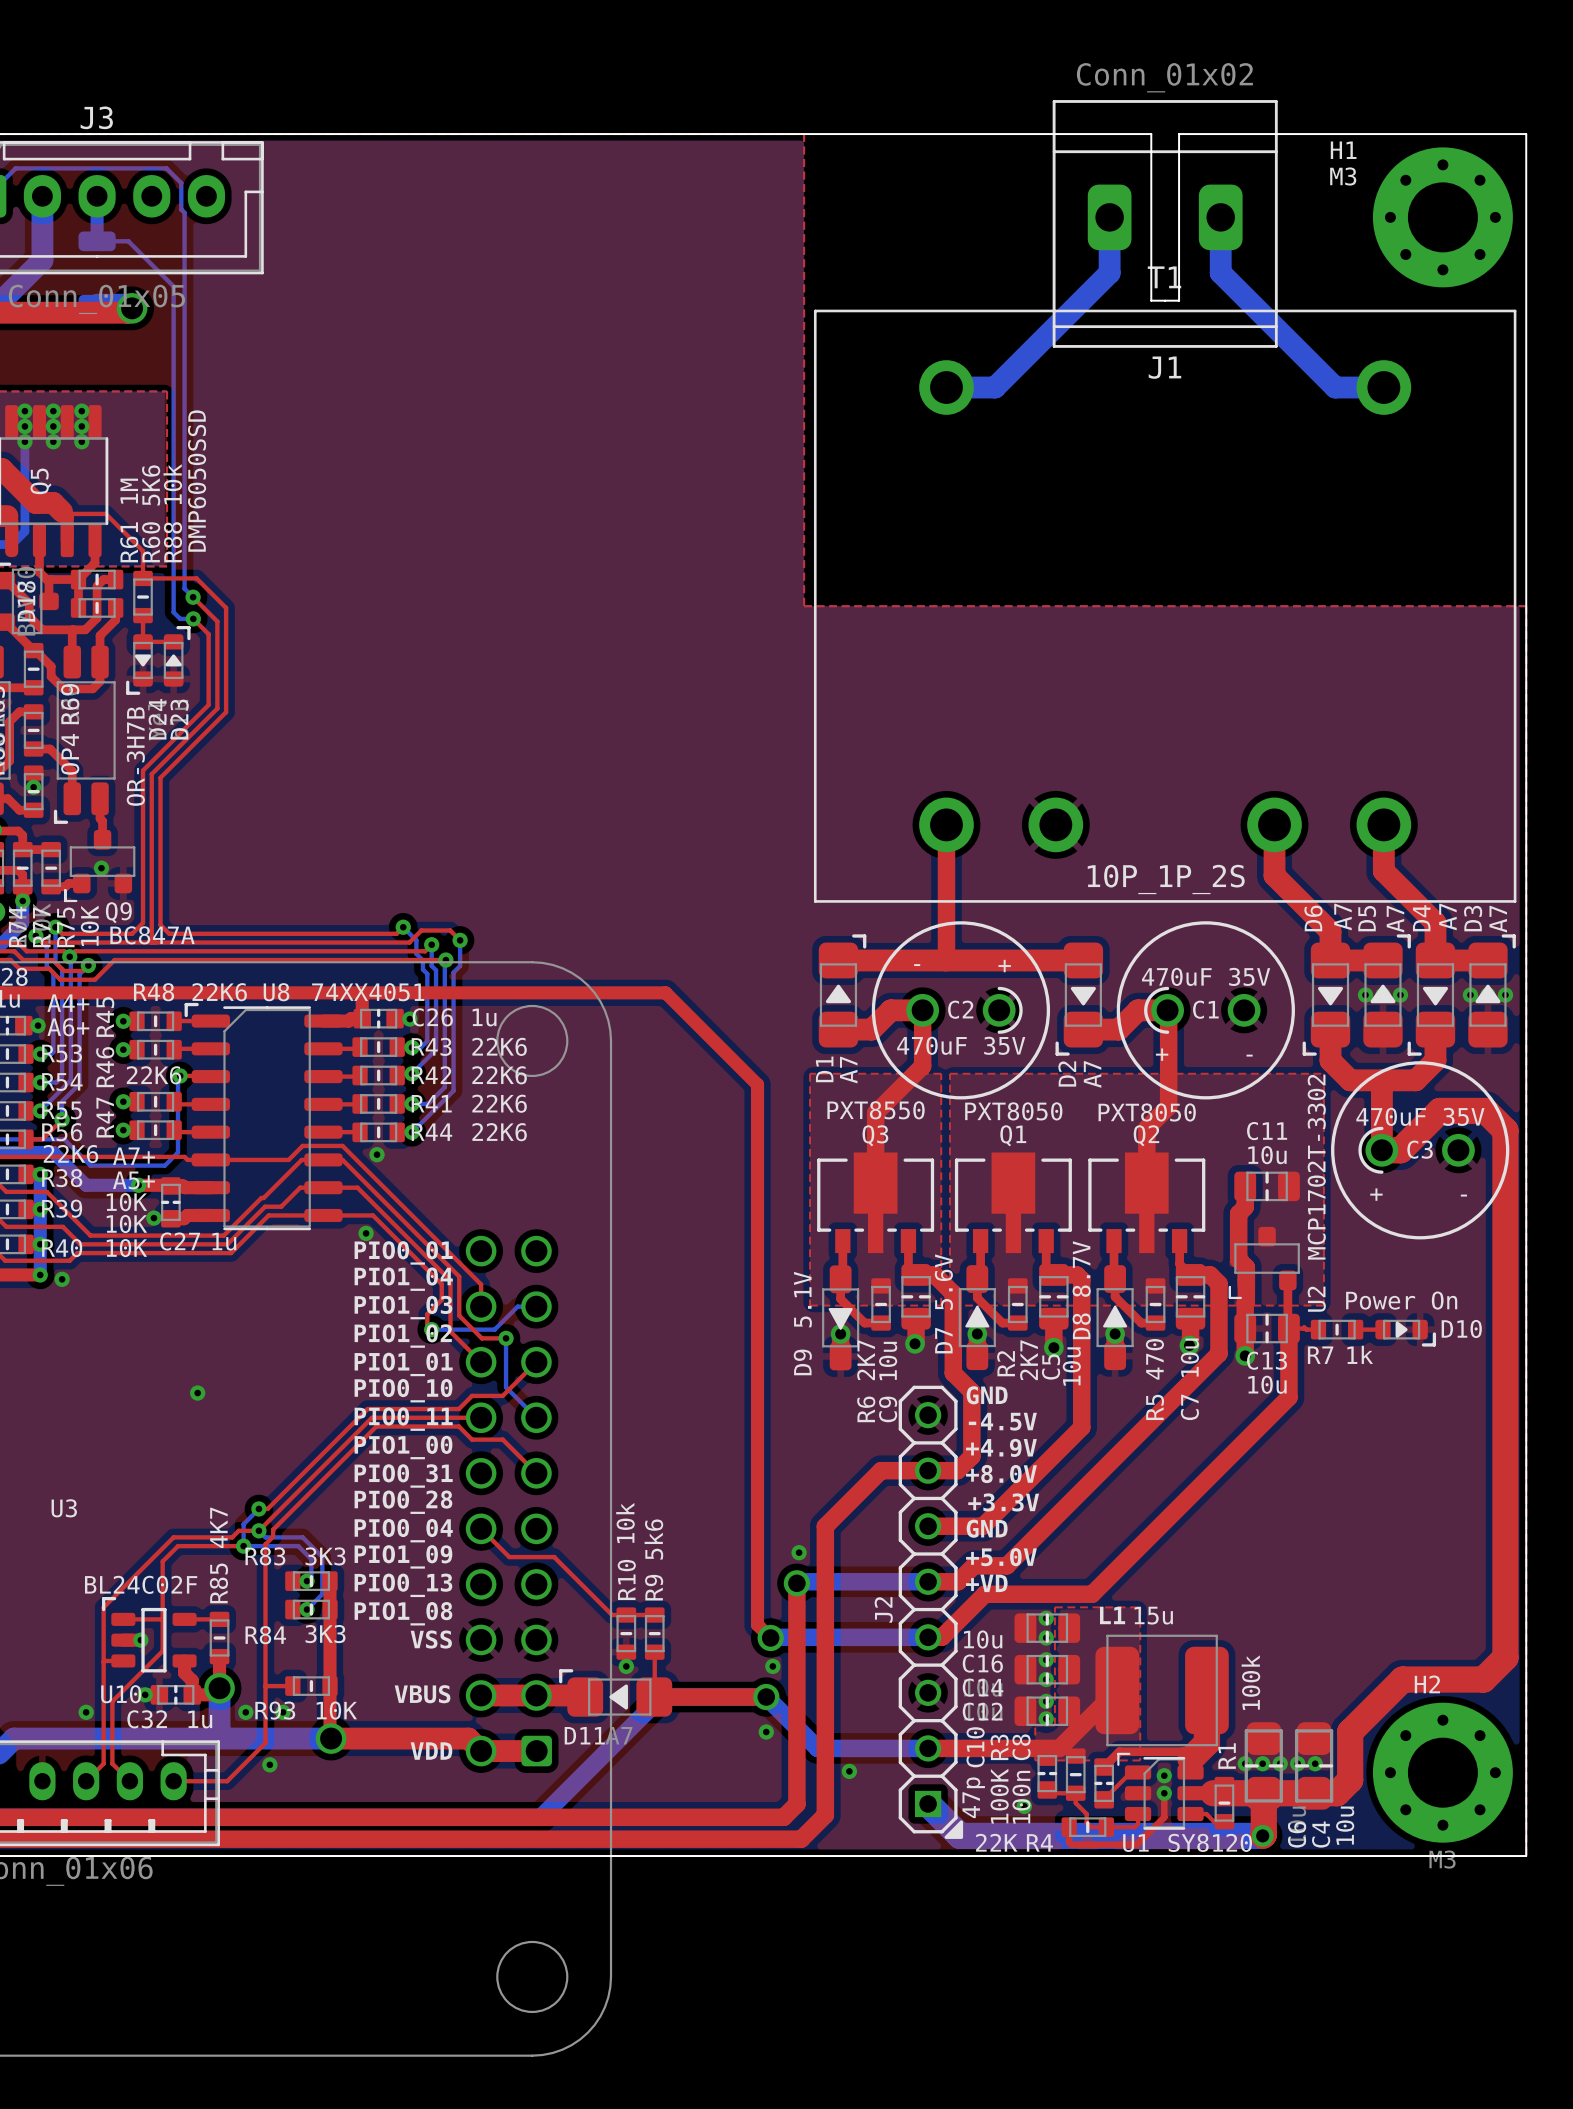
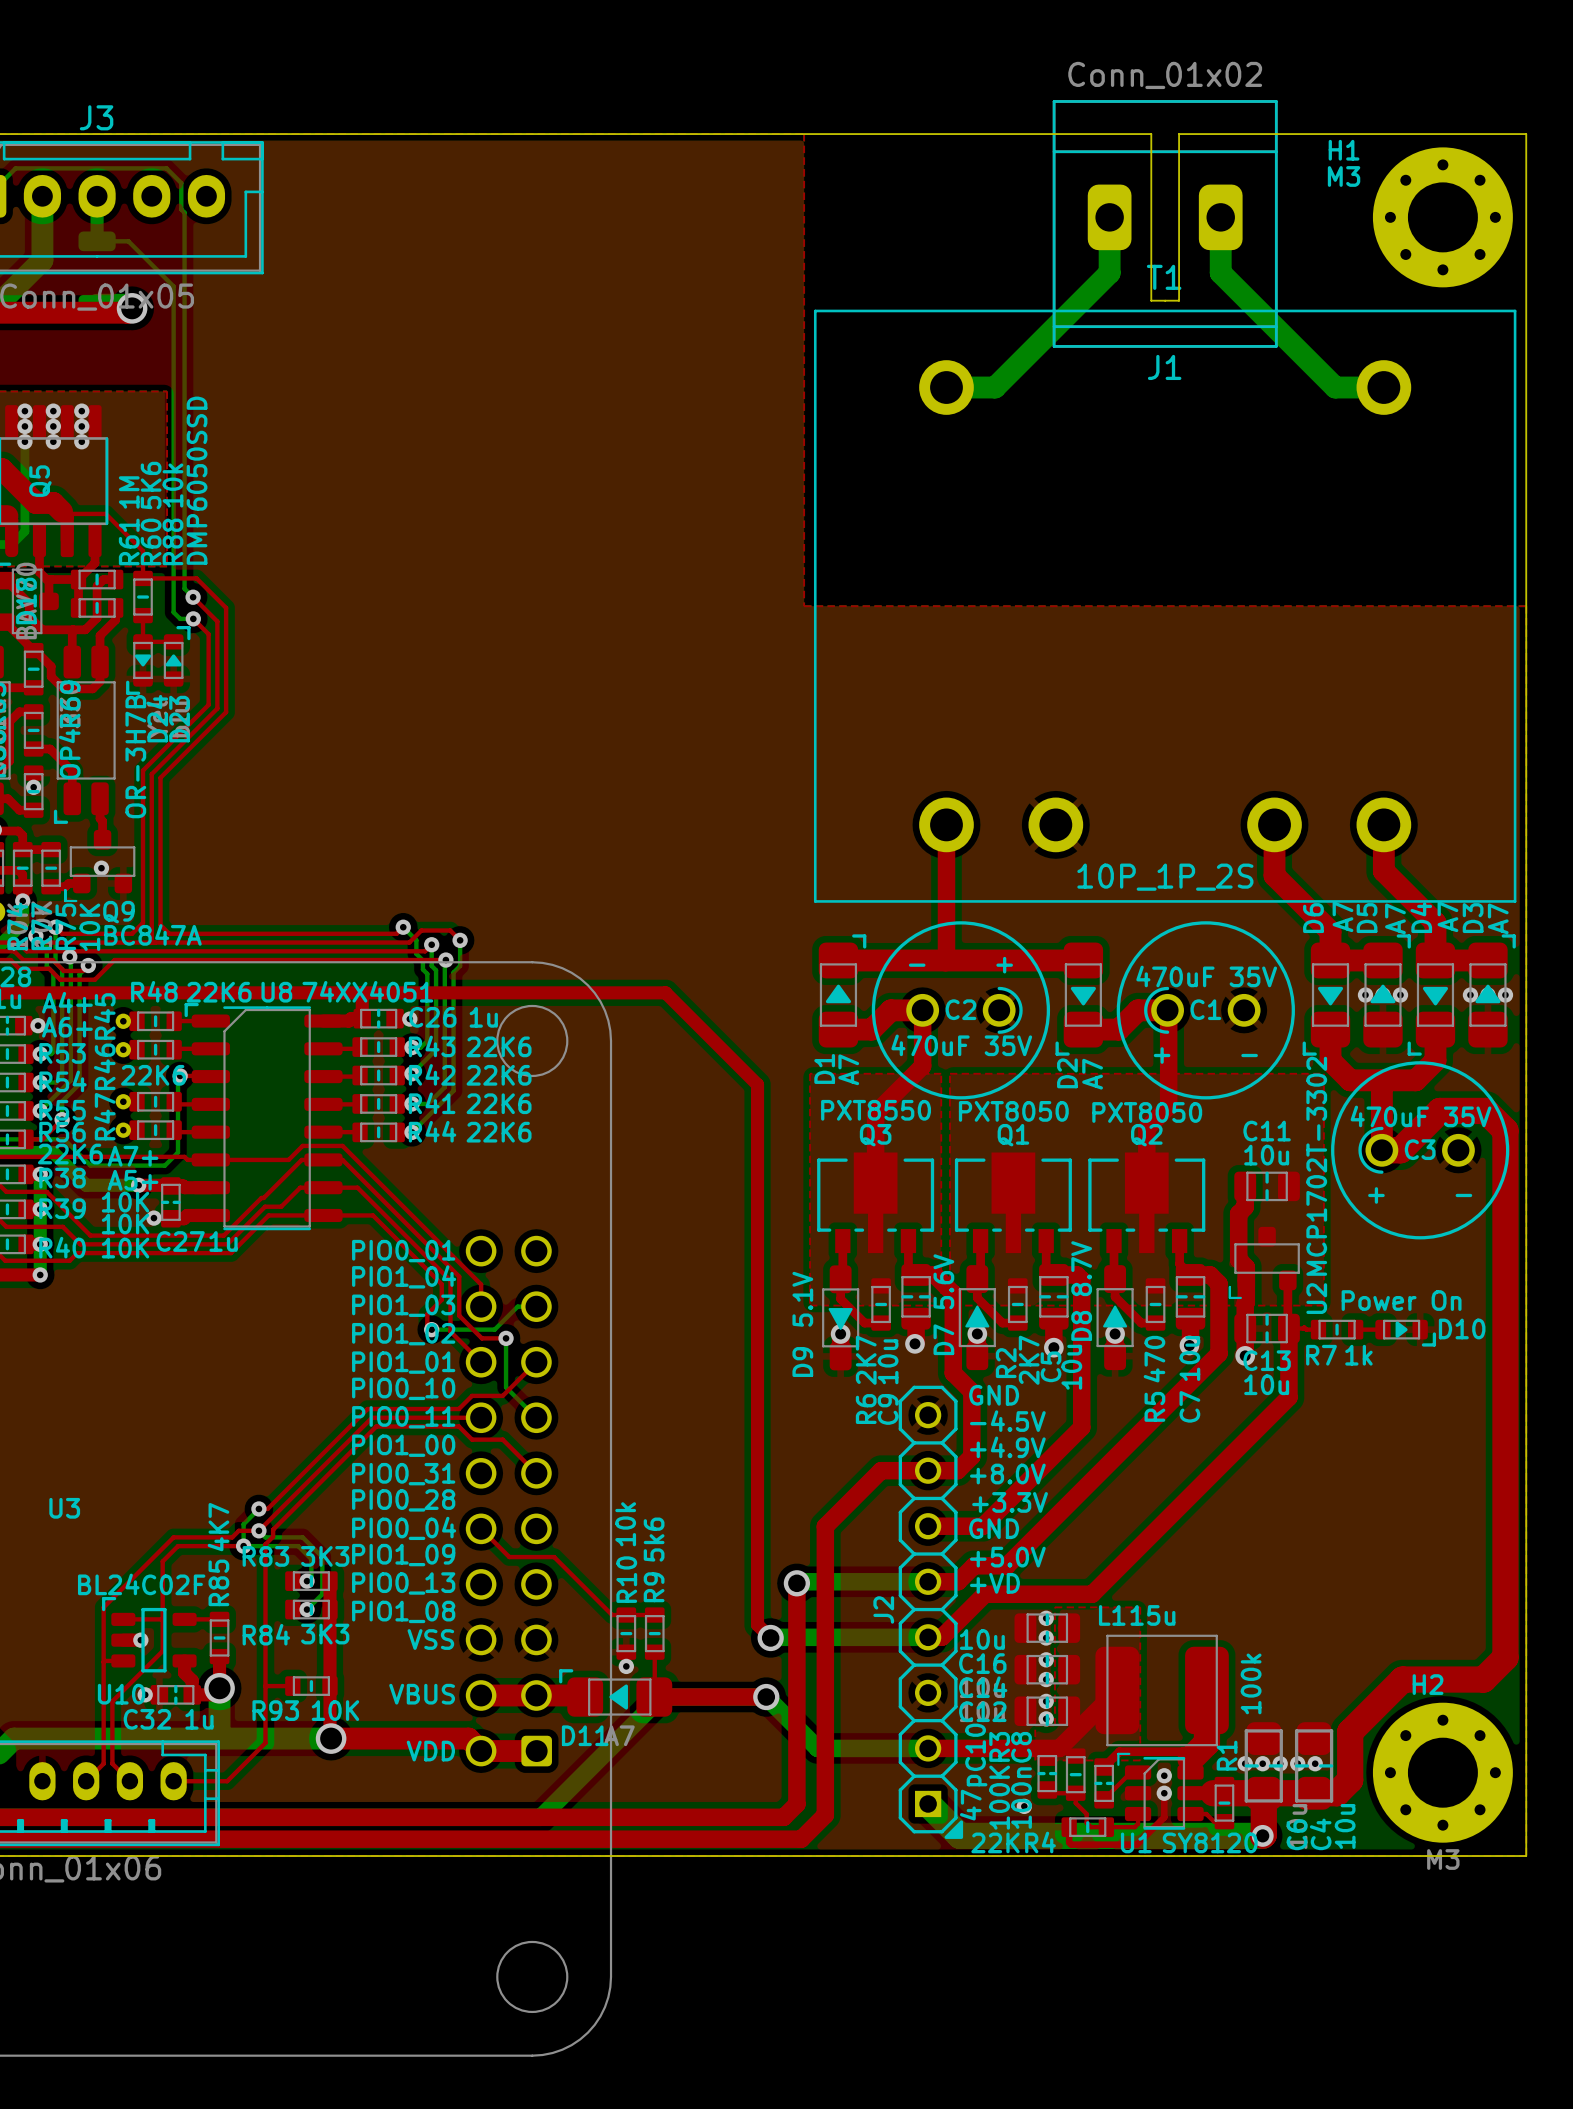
via: (377, 1154) -> none
via: (366, 1233) -> none
via: (62, 1279) -> none
via: (197, 1393) -> none
via: (799, 1552) -> none
via: (772, 1666) -> none
via: (86, 1712) -> none
via: (245, 1712) -> none
via: (282, 1712) -> none
via: (766, 1732) -> none
via: (269, 1764) -> none
via: (849, 1771) -> none

